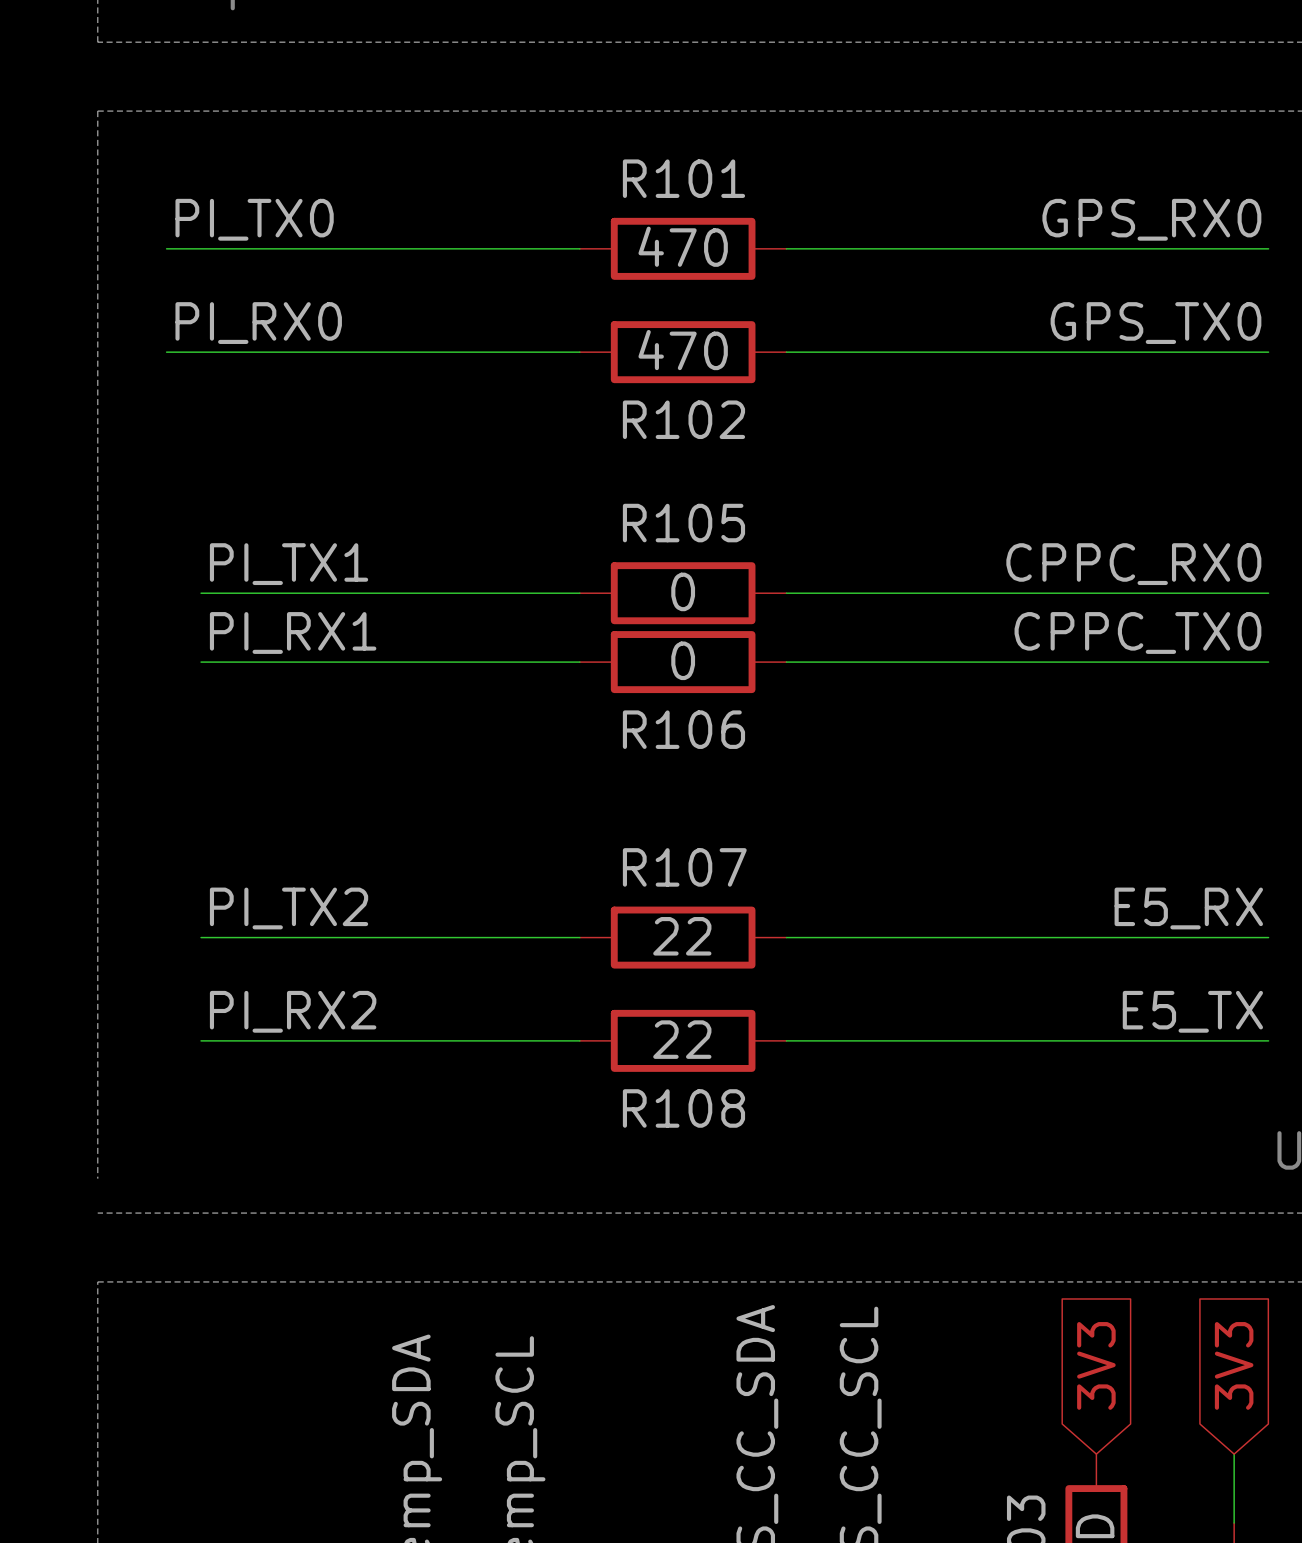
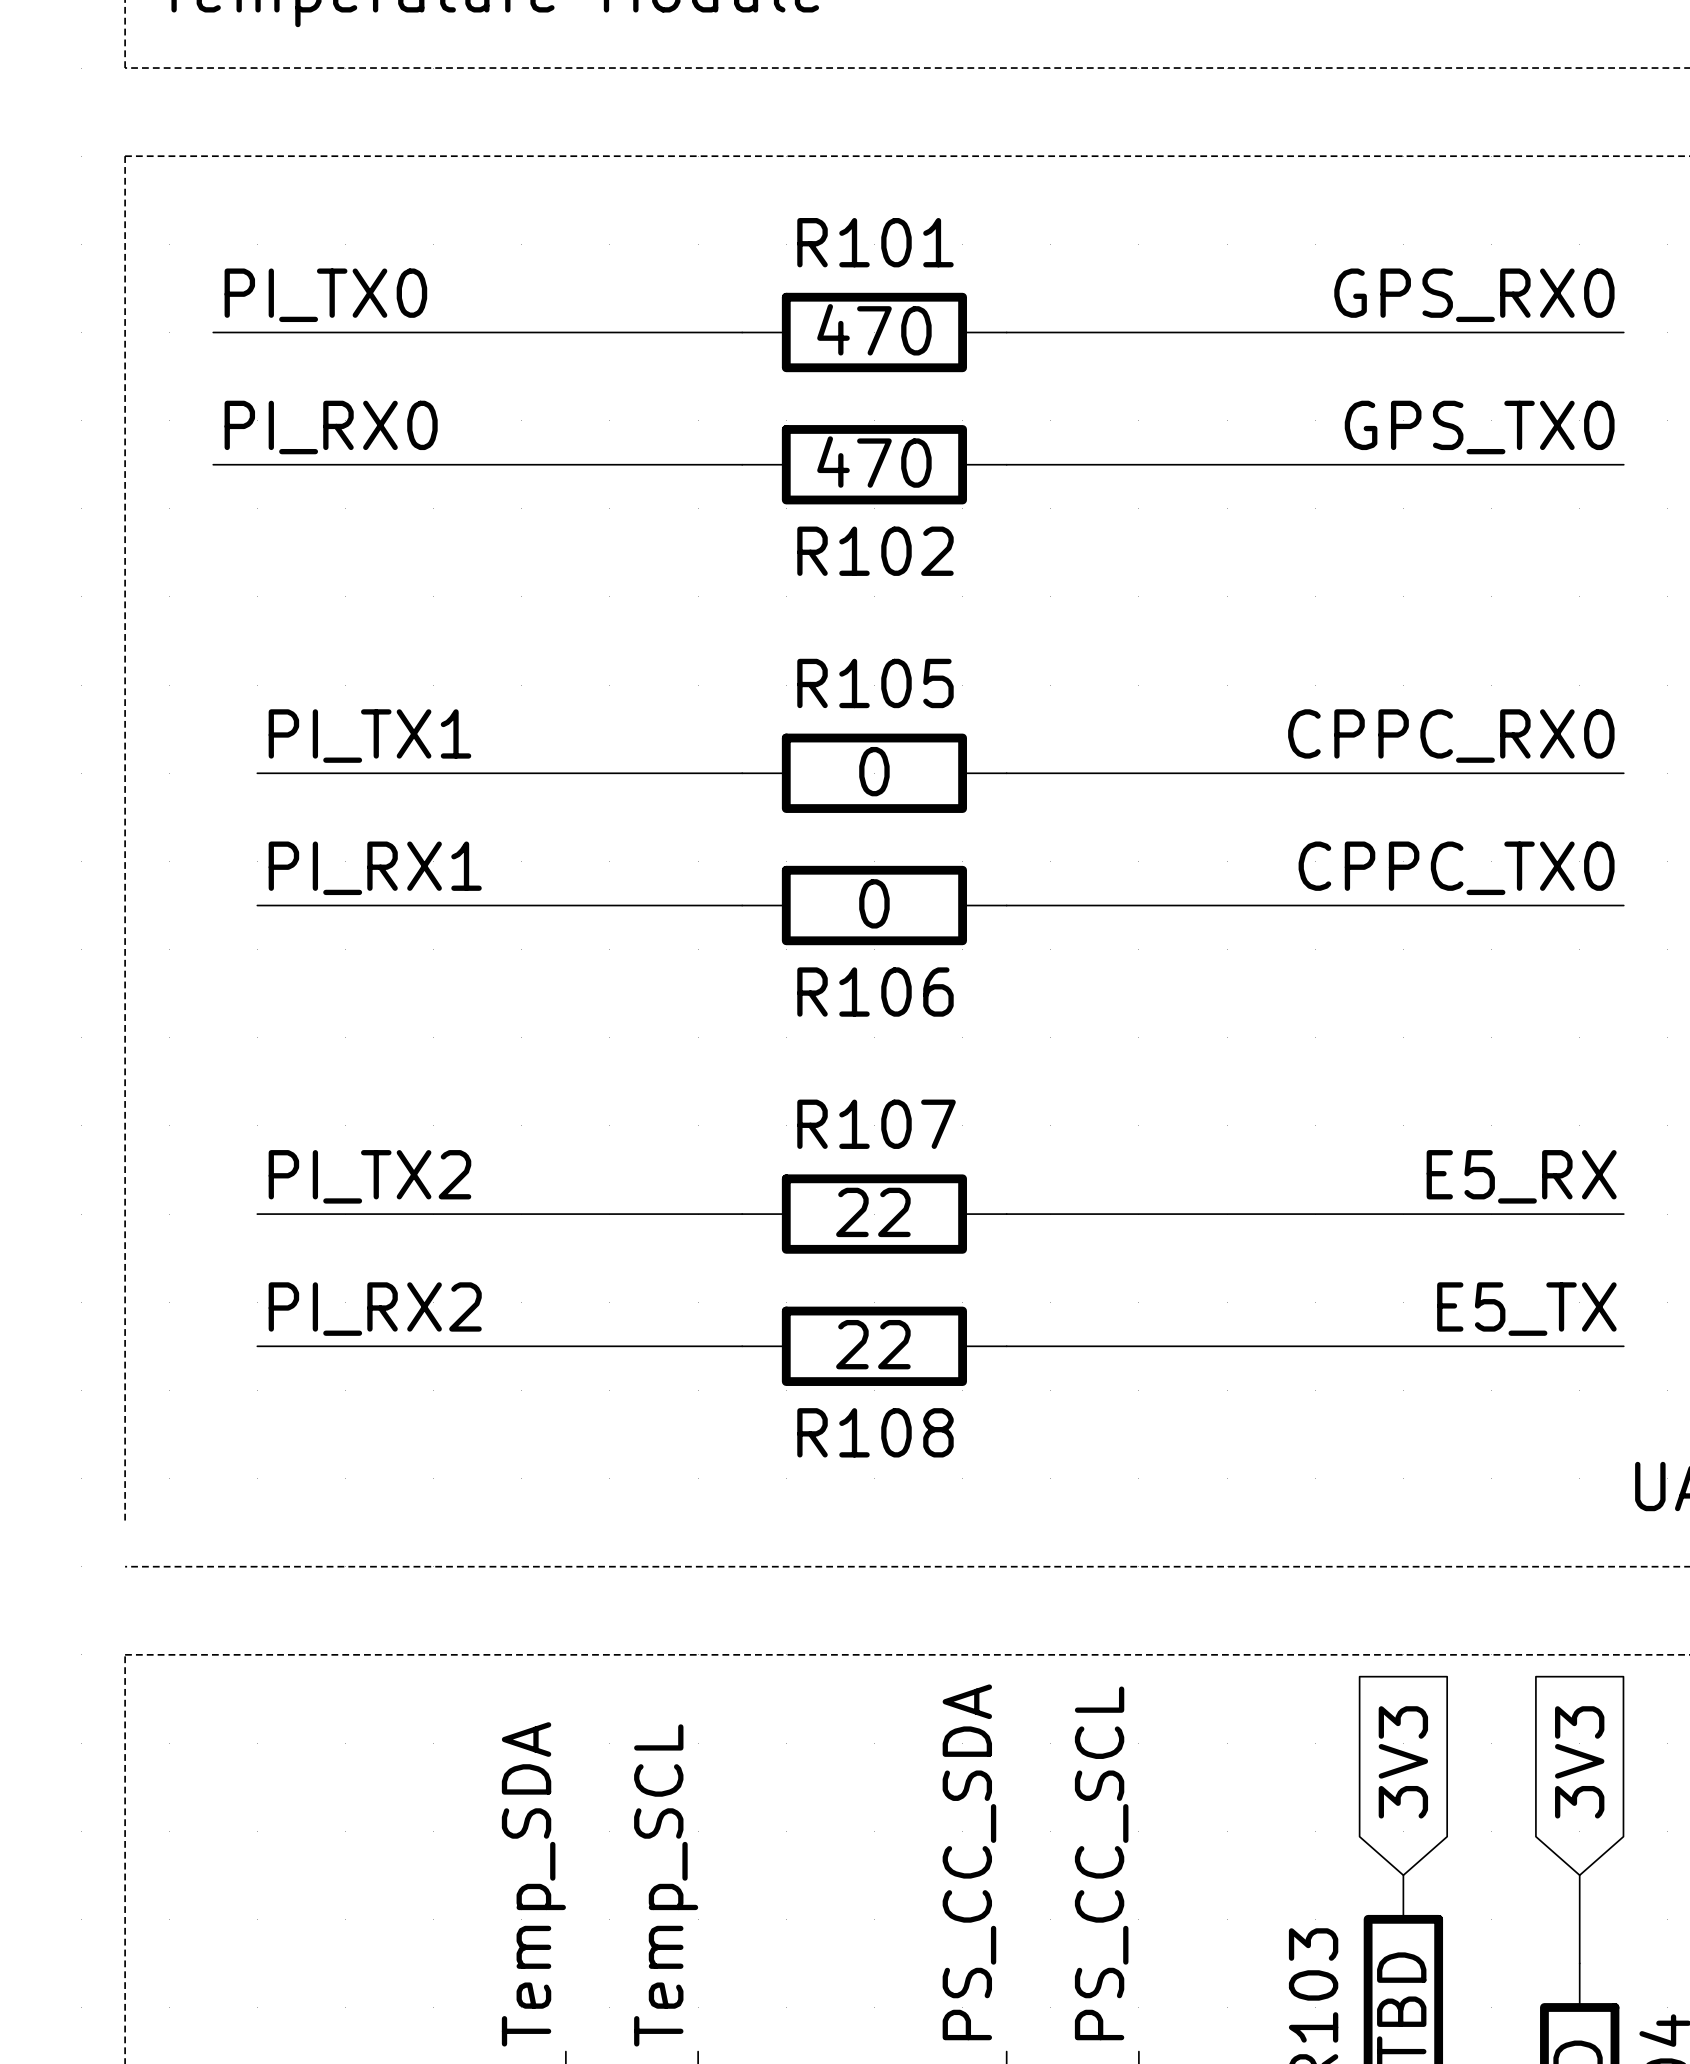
label position: PI_RX1 (293, 632) -> PI_RX1 (375, 868)
label position: CPPC_TX0 (1137, 632) -> CPPC_TX0 (1456, 868)
wire: (201, 662) (579, 662) -> (257, 905) (742, 905)
R106 position: (683, 662) -> (874, 905)
wire: (786, 662) (1268, 662) -> (1006, 905) (1623, 905)

